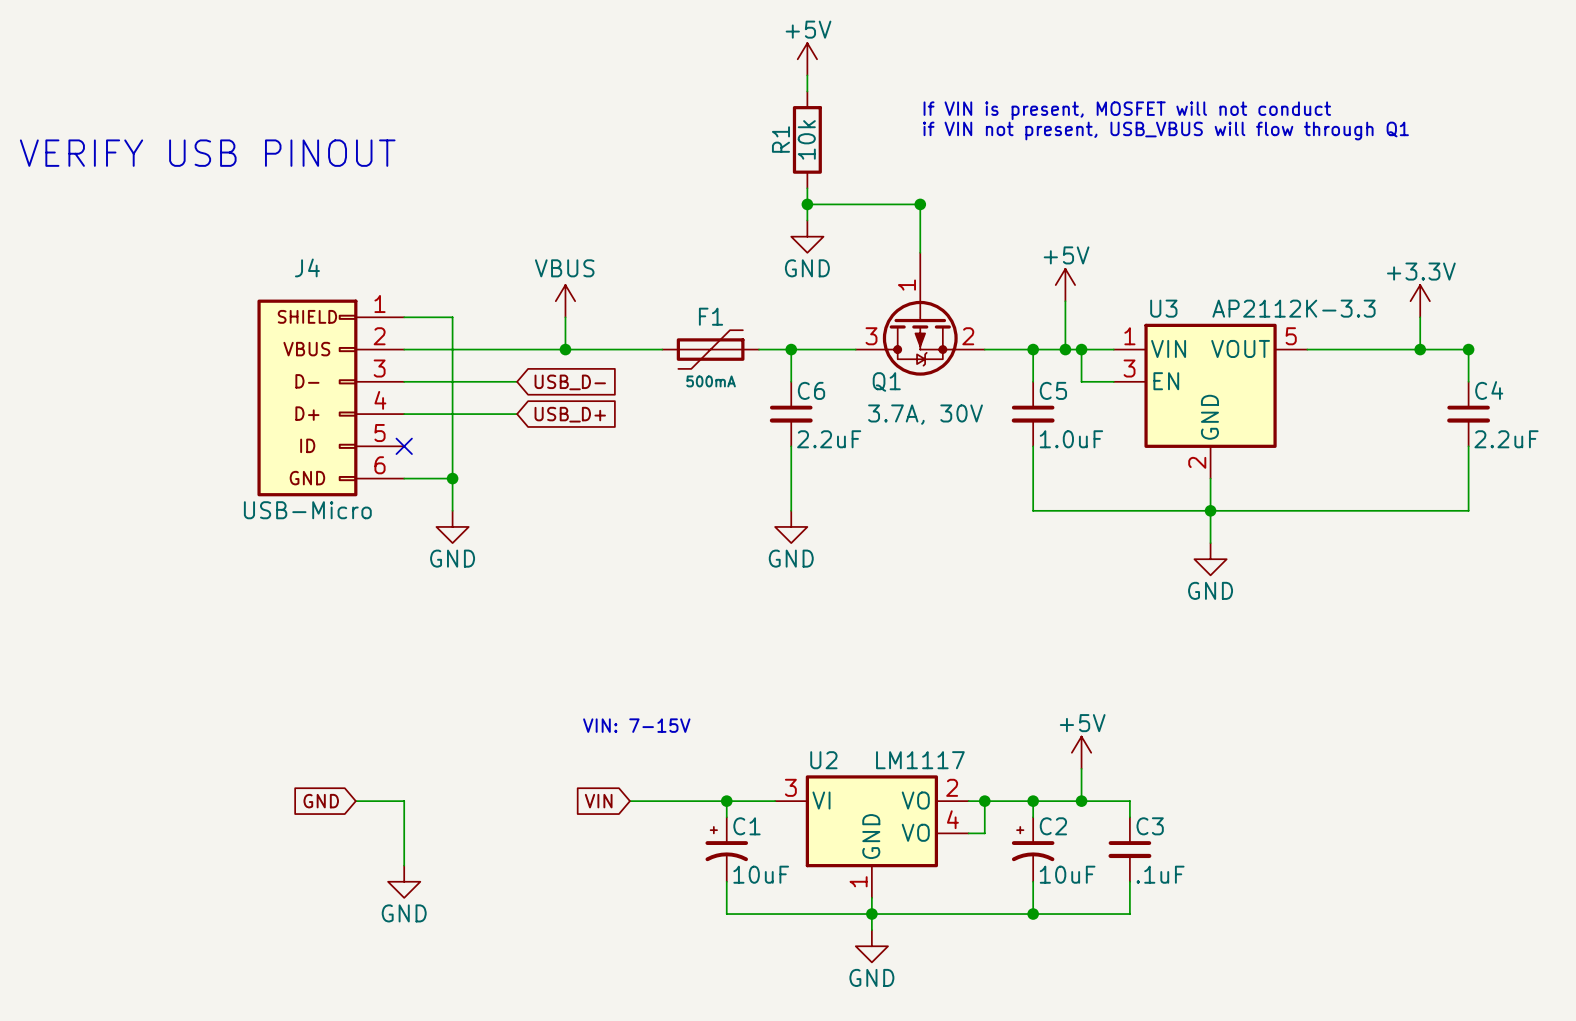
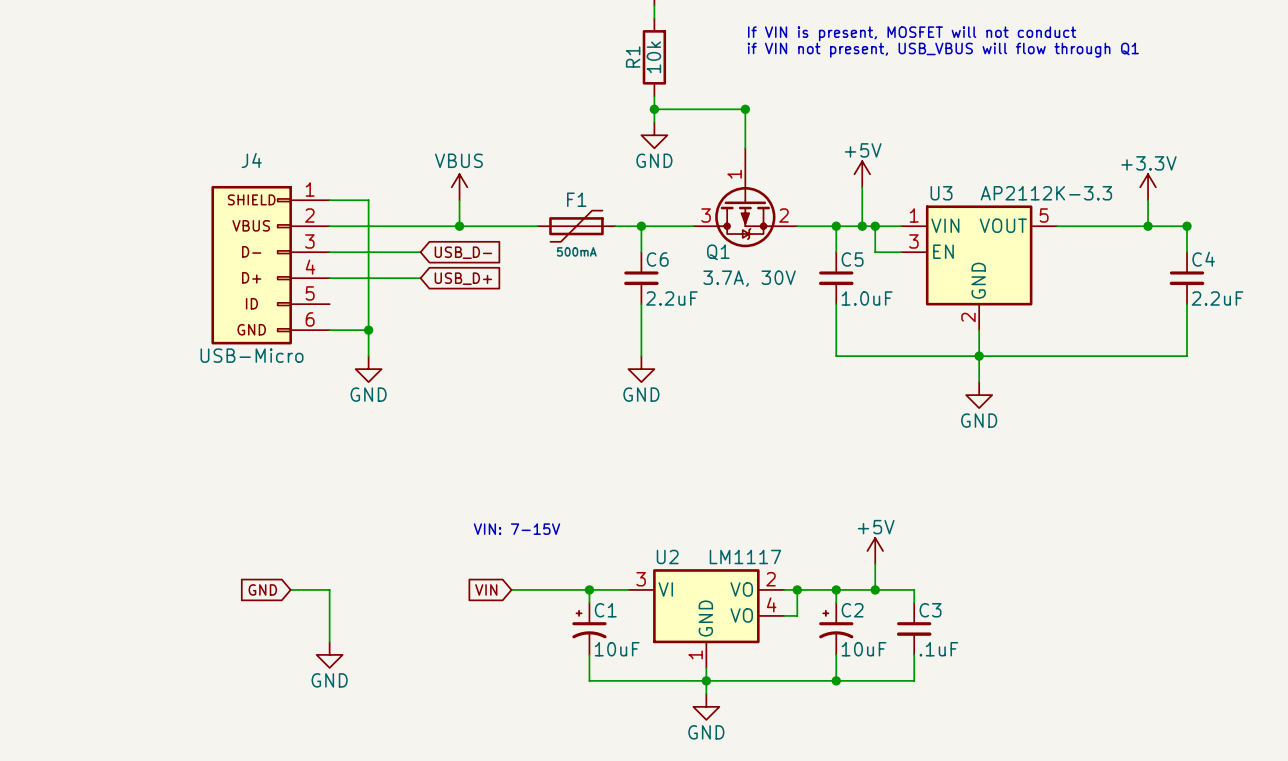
text: VERIFY USB PINOUT (207, 153) -> none
no-connect mark: (404, 446) -> none

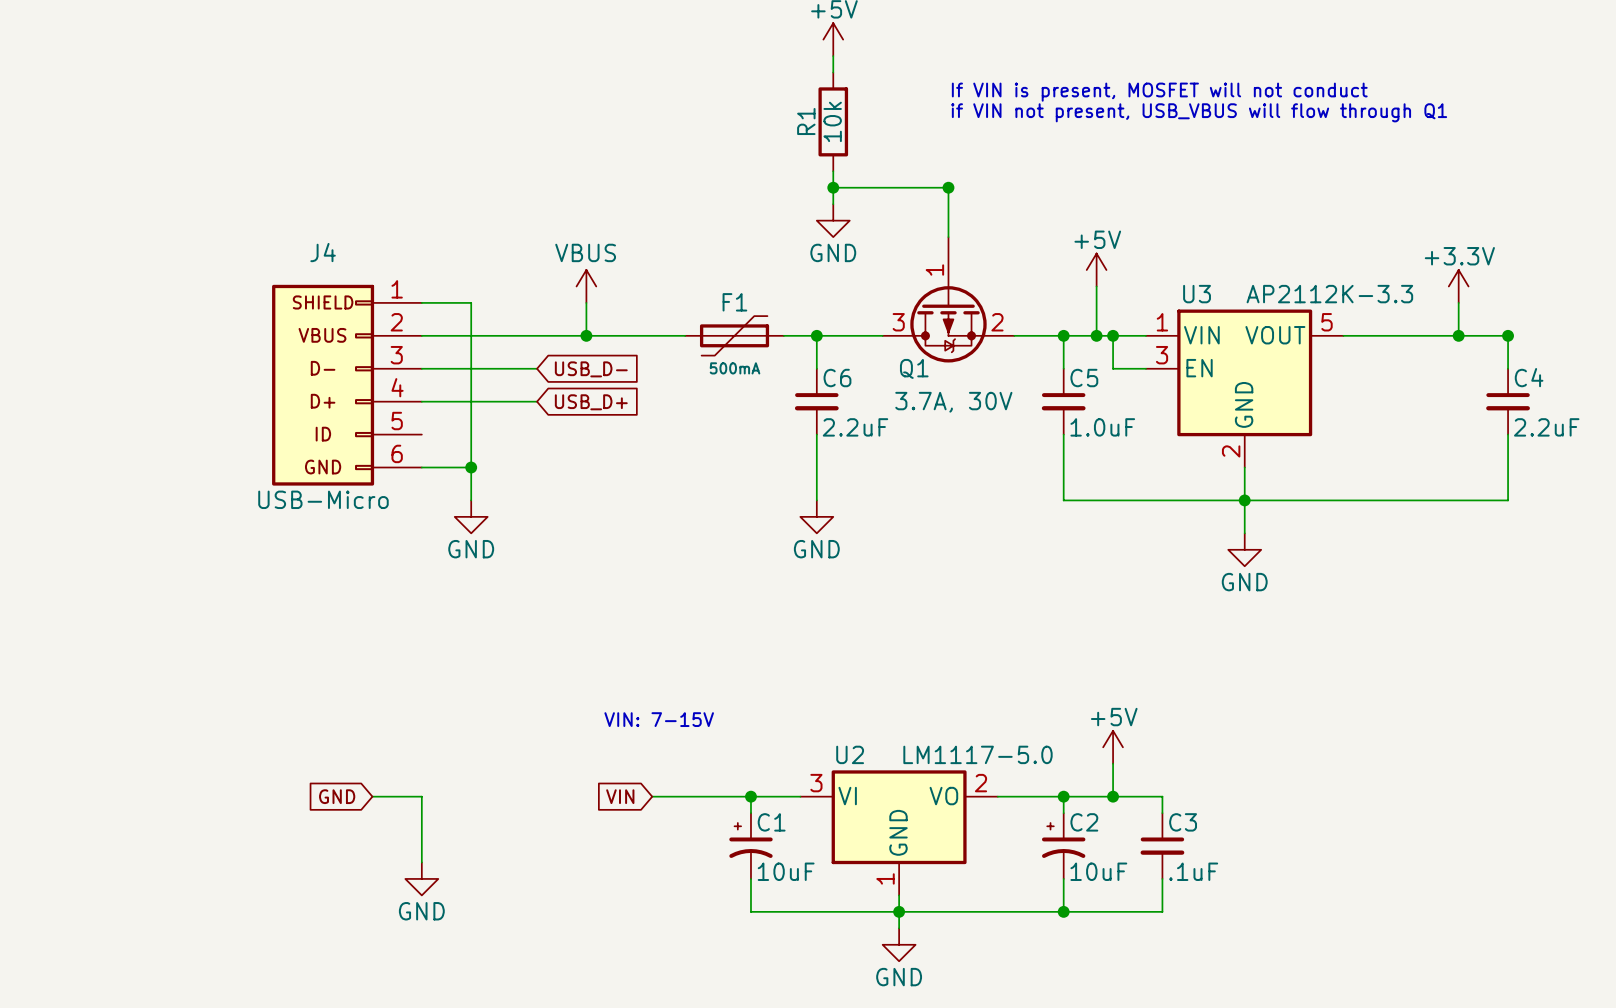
U2 value: LM1117 (745, 556) -> LM1117-5.0 (977, 754)
U2 symbol: [628, 569, 785, 668] -> [800, 770, 998, 896]
wire: (797, 589) (797, 615) (784, 615) -> none
junction: (797, 589) -> none

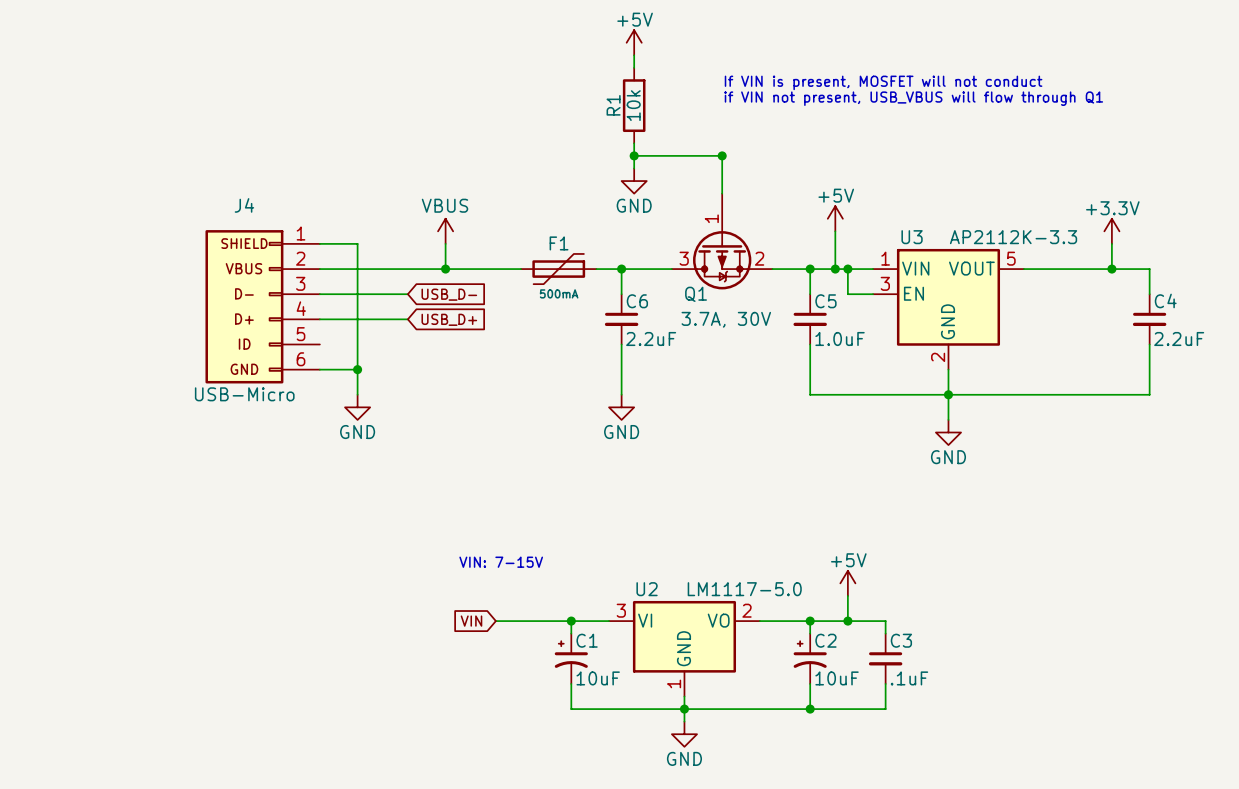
junction: (1508, 335) -> none
global label: GND (337, 796) -> none
wire: (372, 796) (421, 796) (421, 862) -> none
power symbol: GND (421, 878) -> none

